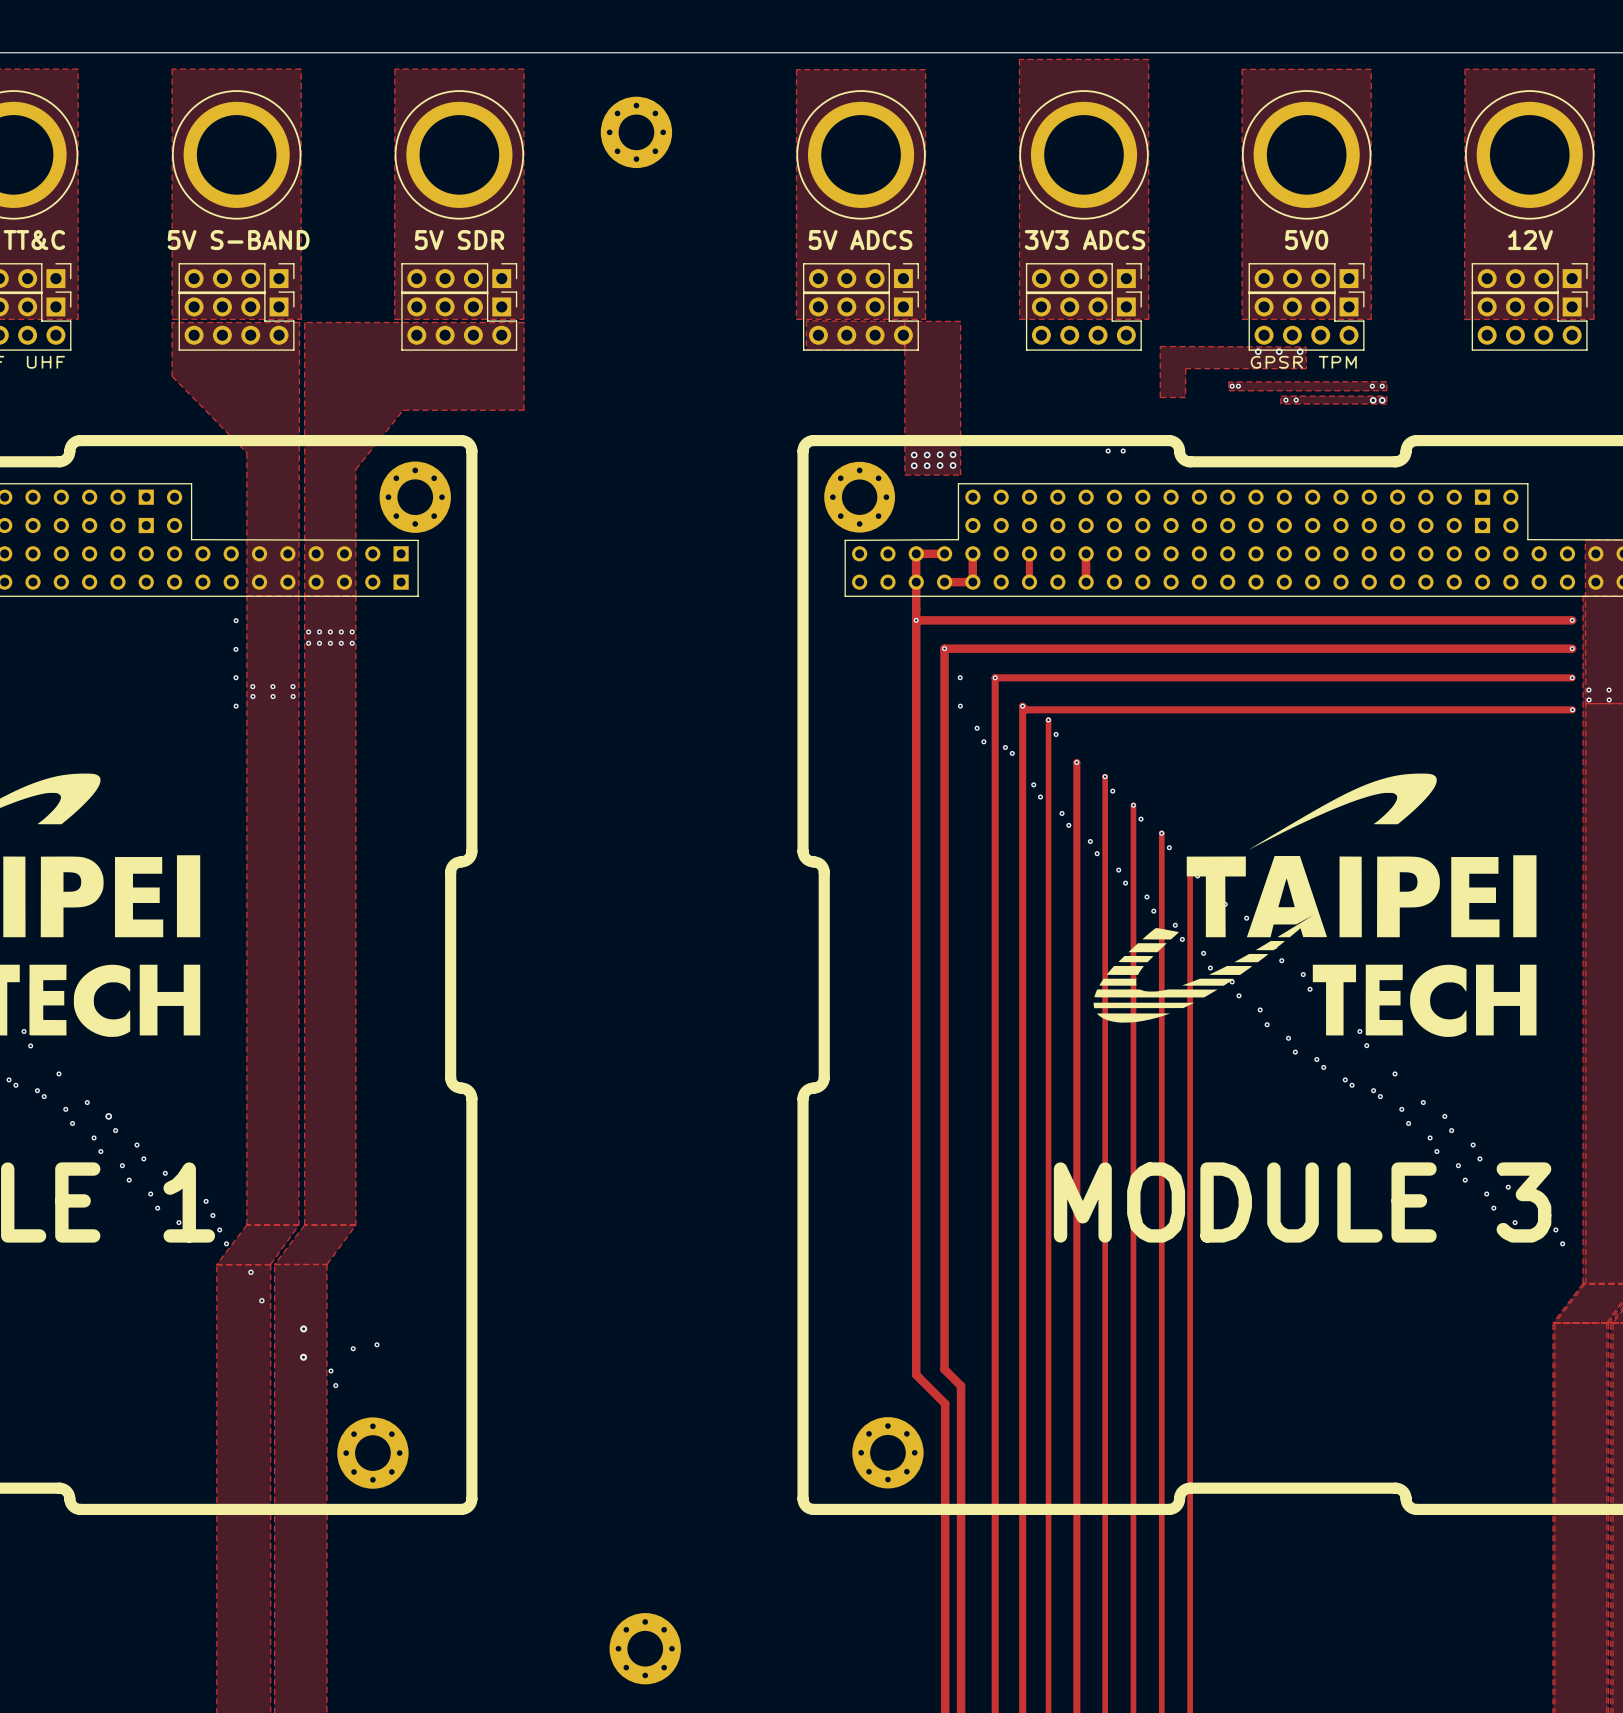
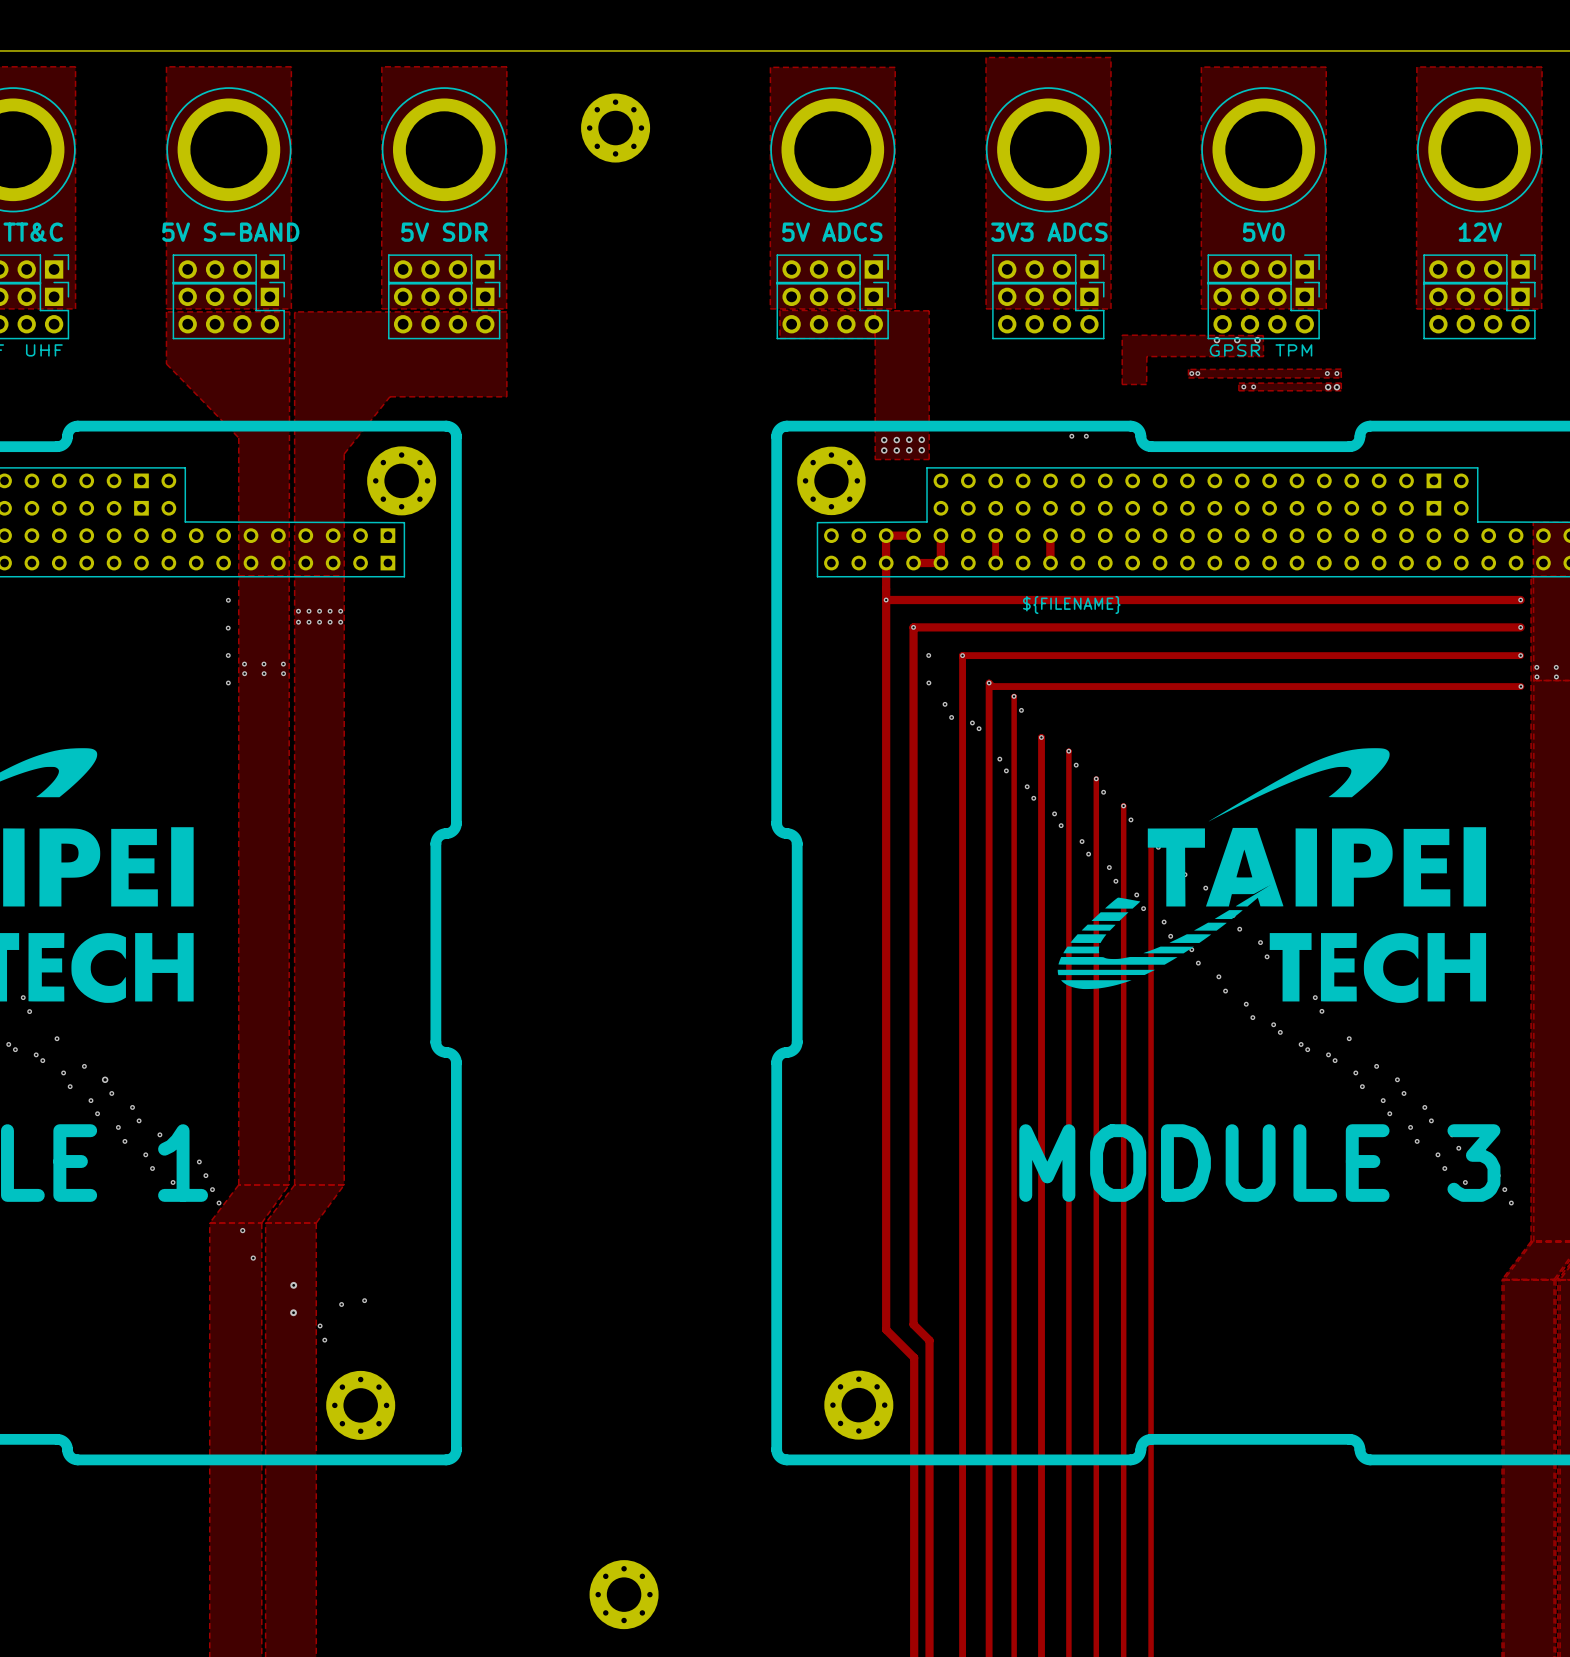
text: none -> ${FILENAME} (1071, 604)

